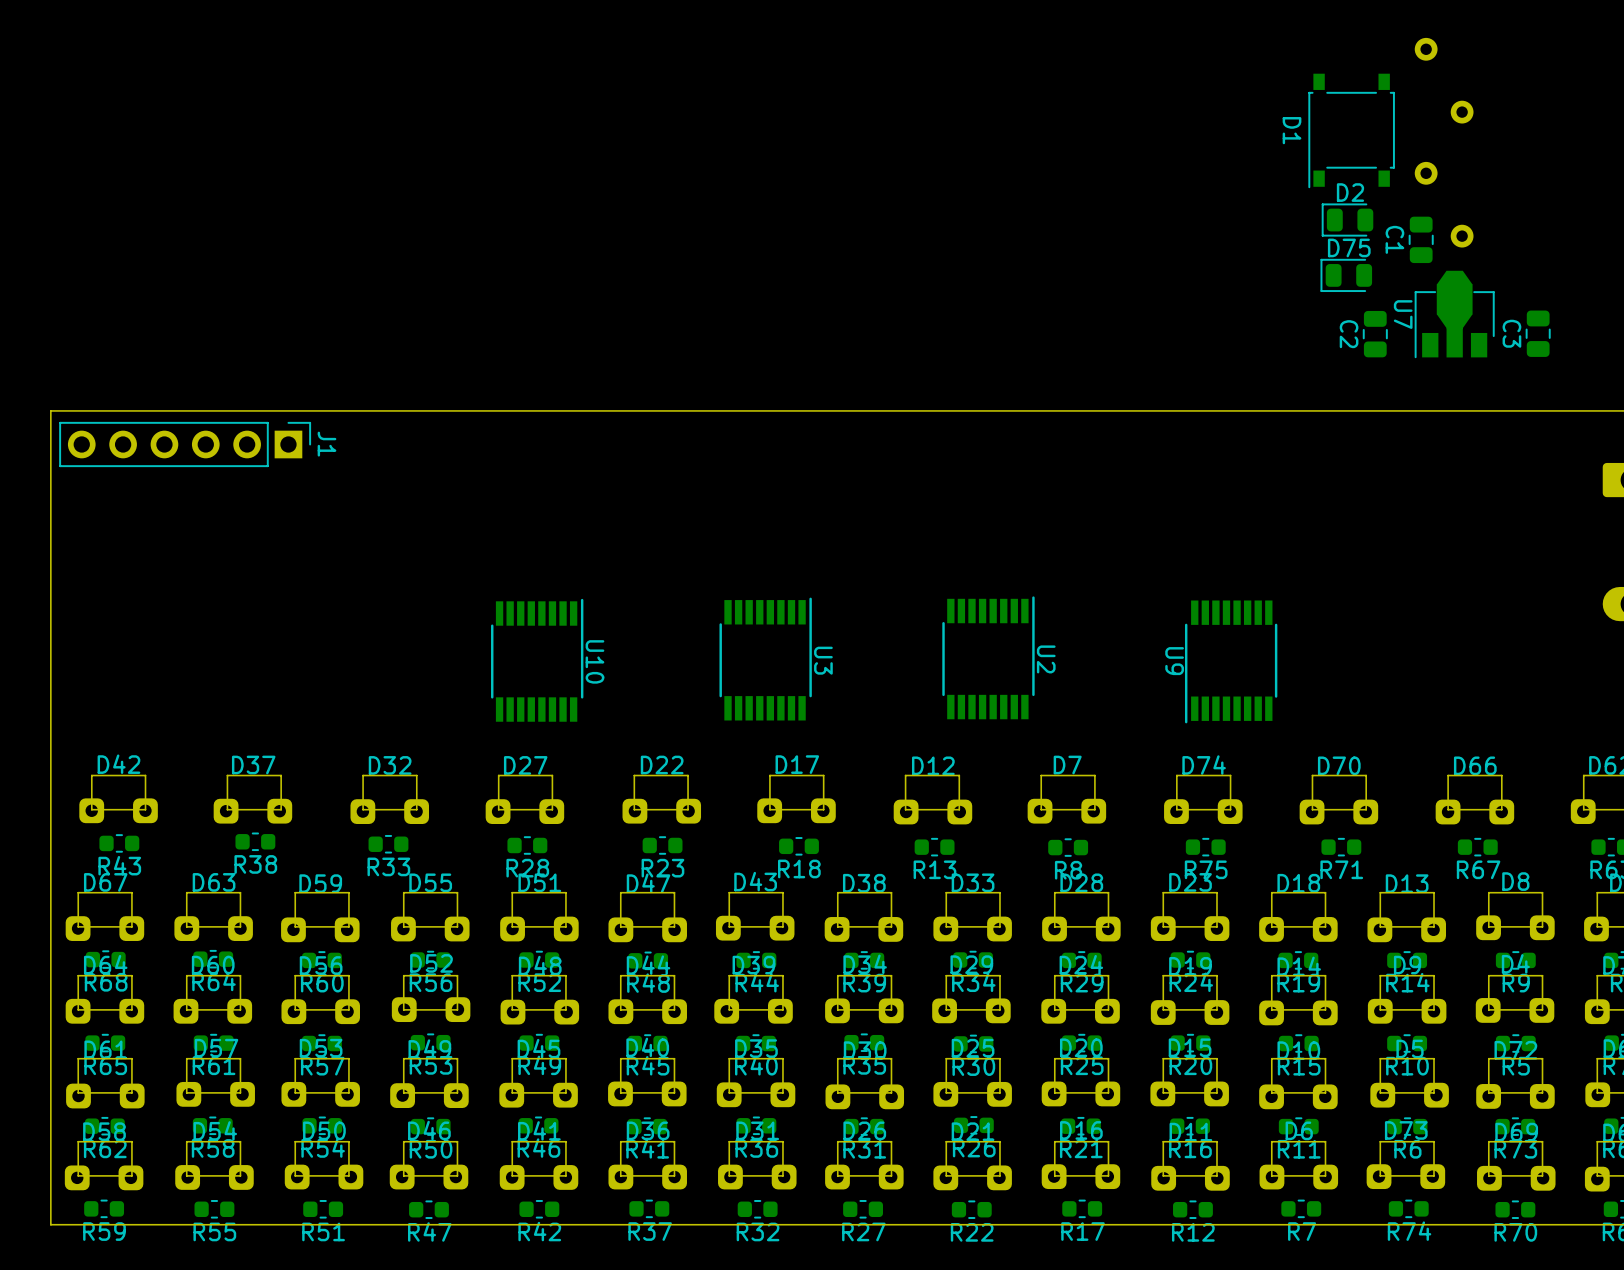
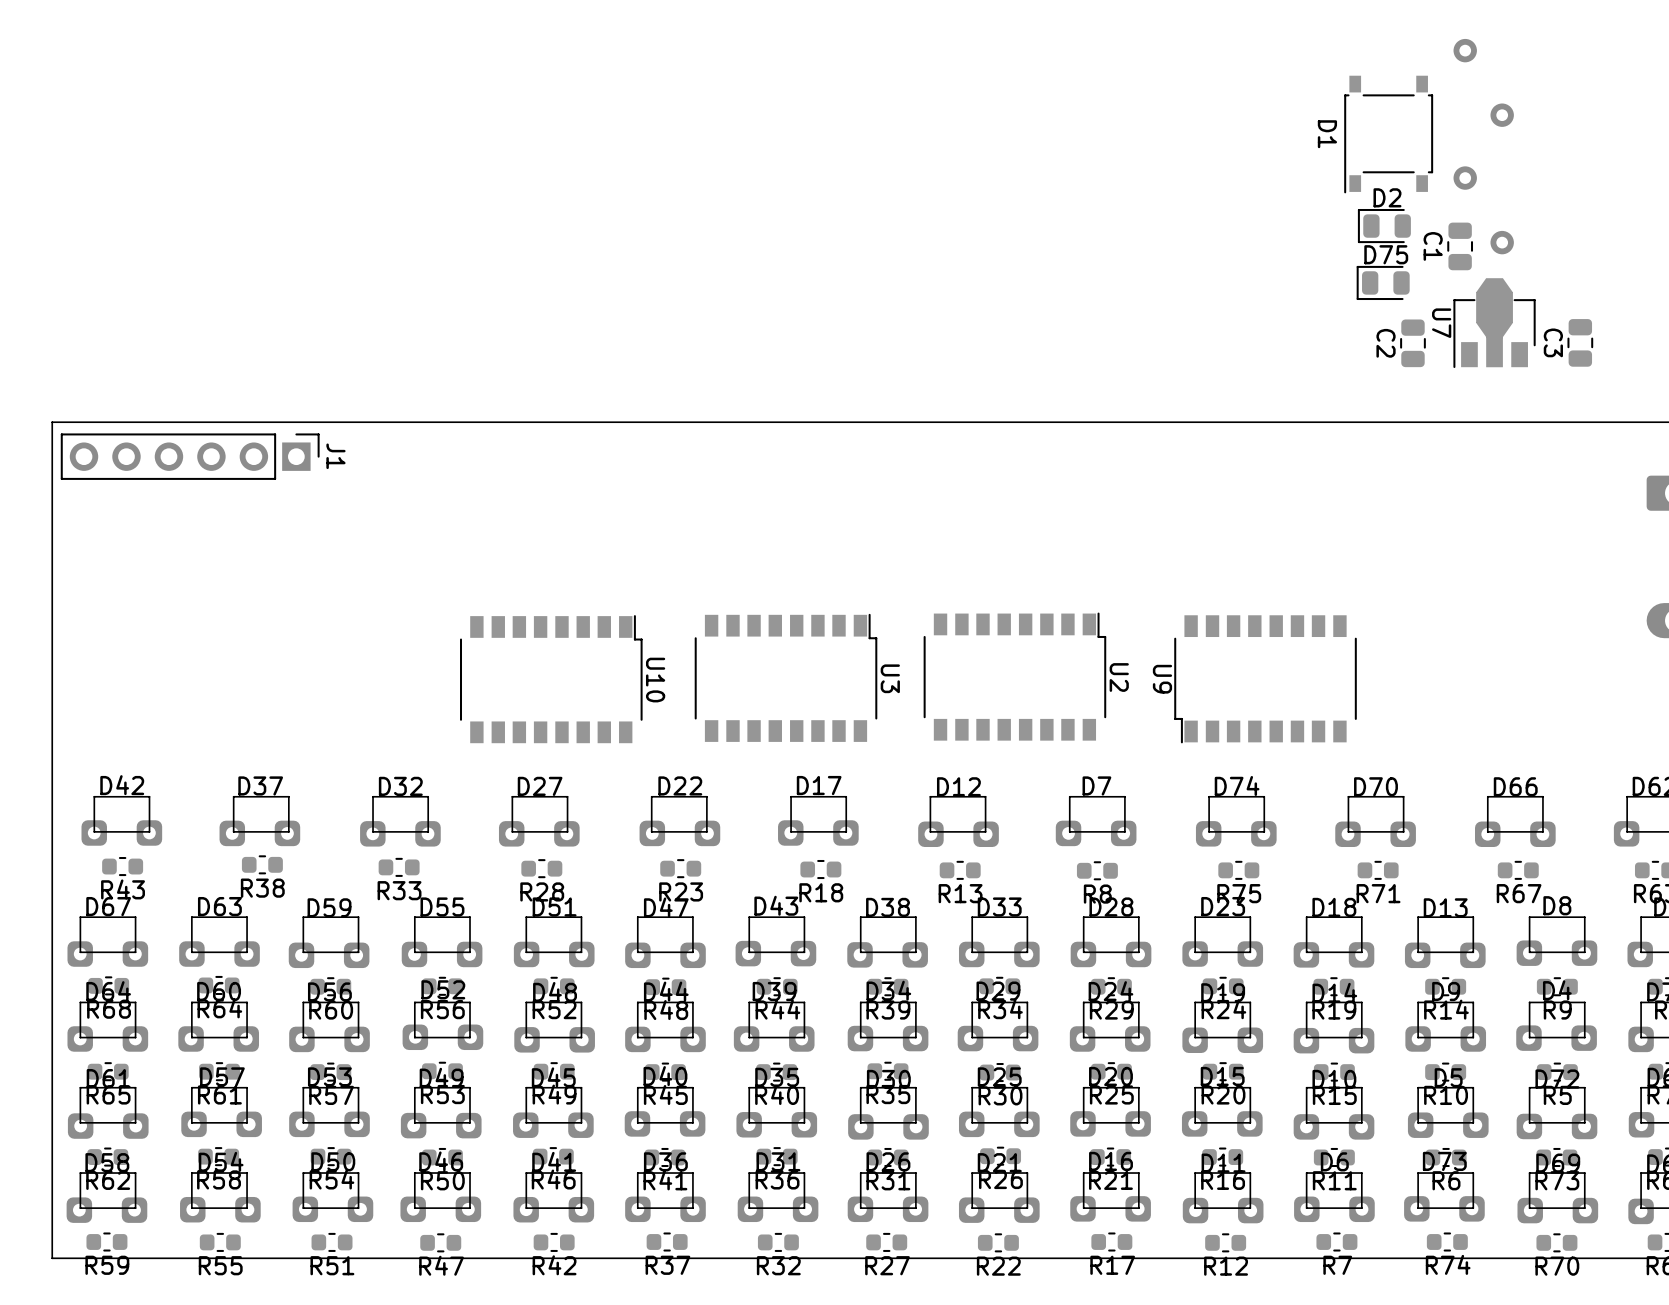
U2 footprint: [942, 596, 1035, 720] -> [923, 612, 1107, 741]
U3 footprint: [719, 597, 812, 721] -> [694, 613, 878, 742]
U10 footprint: [491, 598, 584, 722] -> [459, 615, 643, 744]
U9 footprint: [1184, 600, 1278, 724] -> [1174, 615, 1357, 744]
U2 name position: U2 (1046, 659) -> U2 (1119, 677)
U3 name position: U3 (823, 660) -> U3 (890, 678)
U10 name position: U10 (594, 661) -> U10 (655, 680)
U9 name position: U9 (1174, 661) -> U9 (1162, 679)

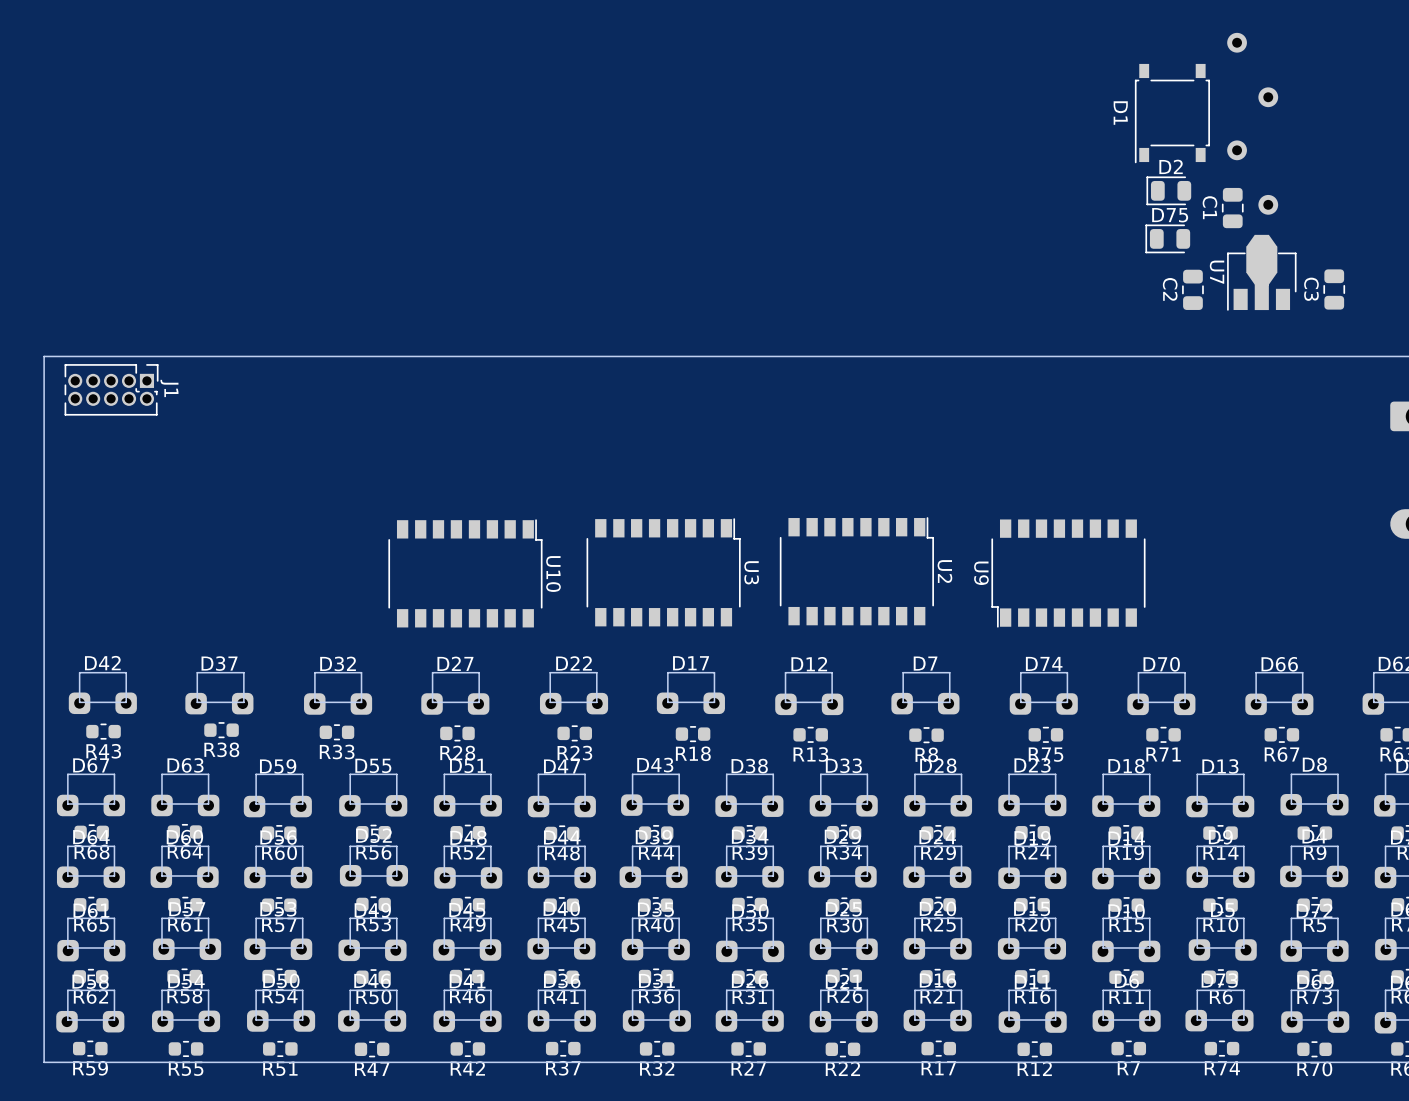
J1 footprint: [60, 433, 320, 480] -> [64, 364, 159, 416]
J1 name position: J1 (335, 456) -> J1 (169, 388)

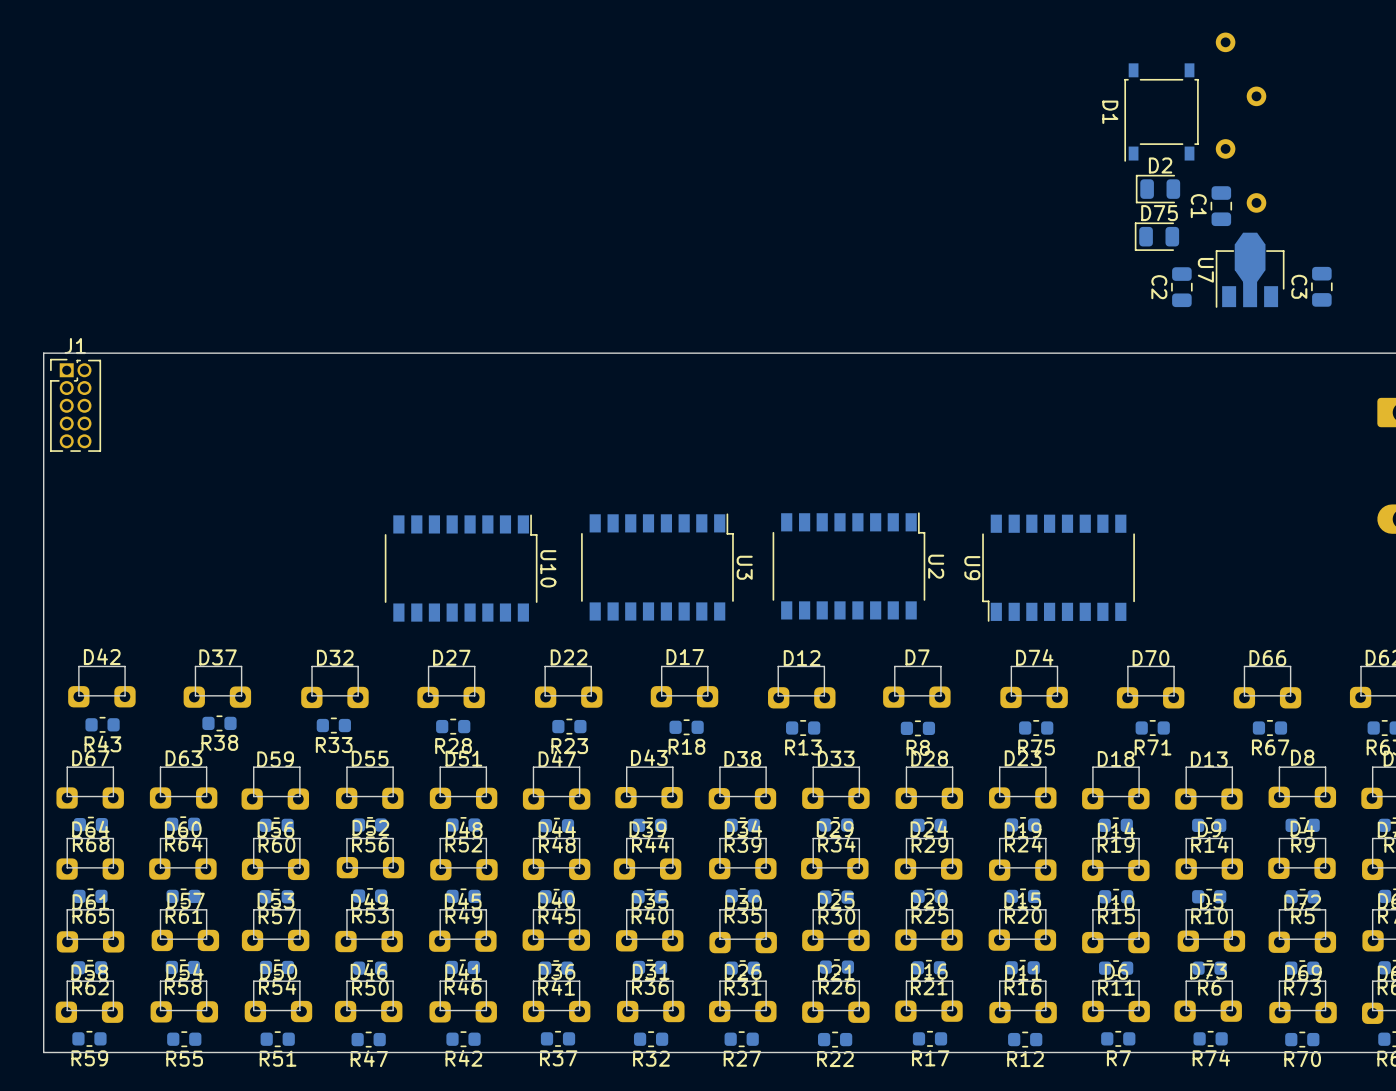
J1 rotation: 0° (111, 389) -> 90° counterclockwise (75, 405)

